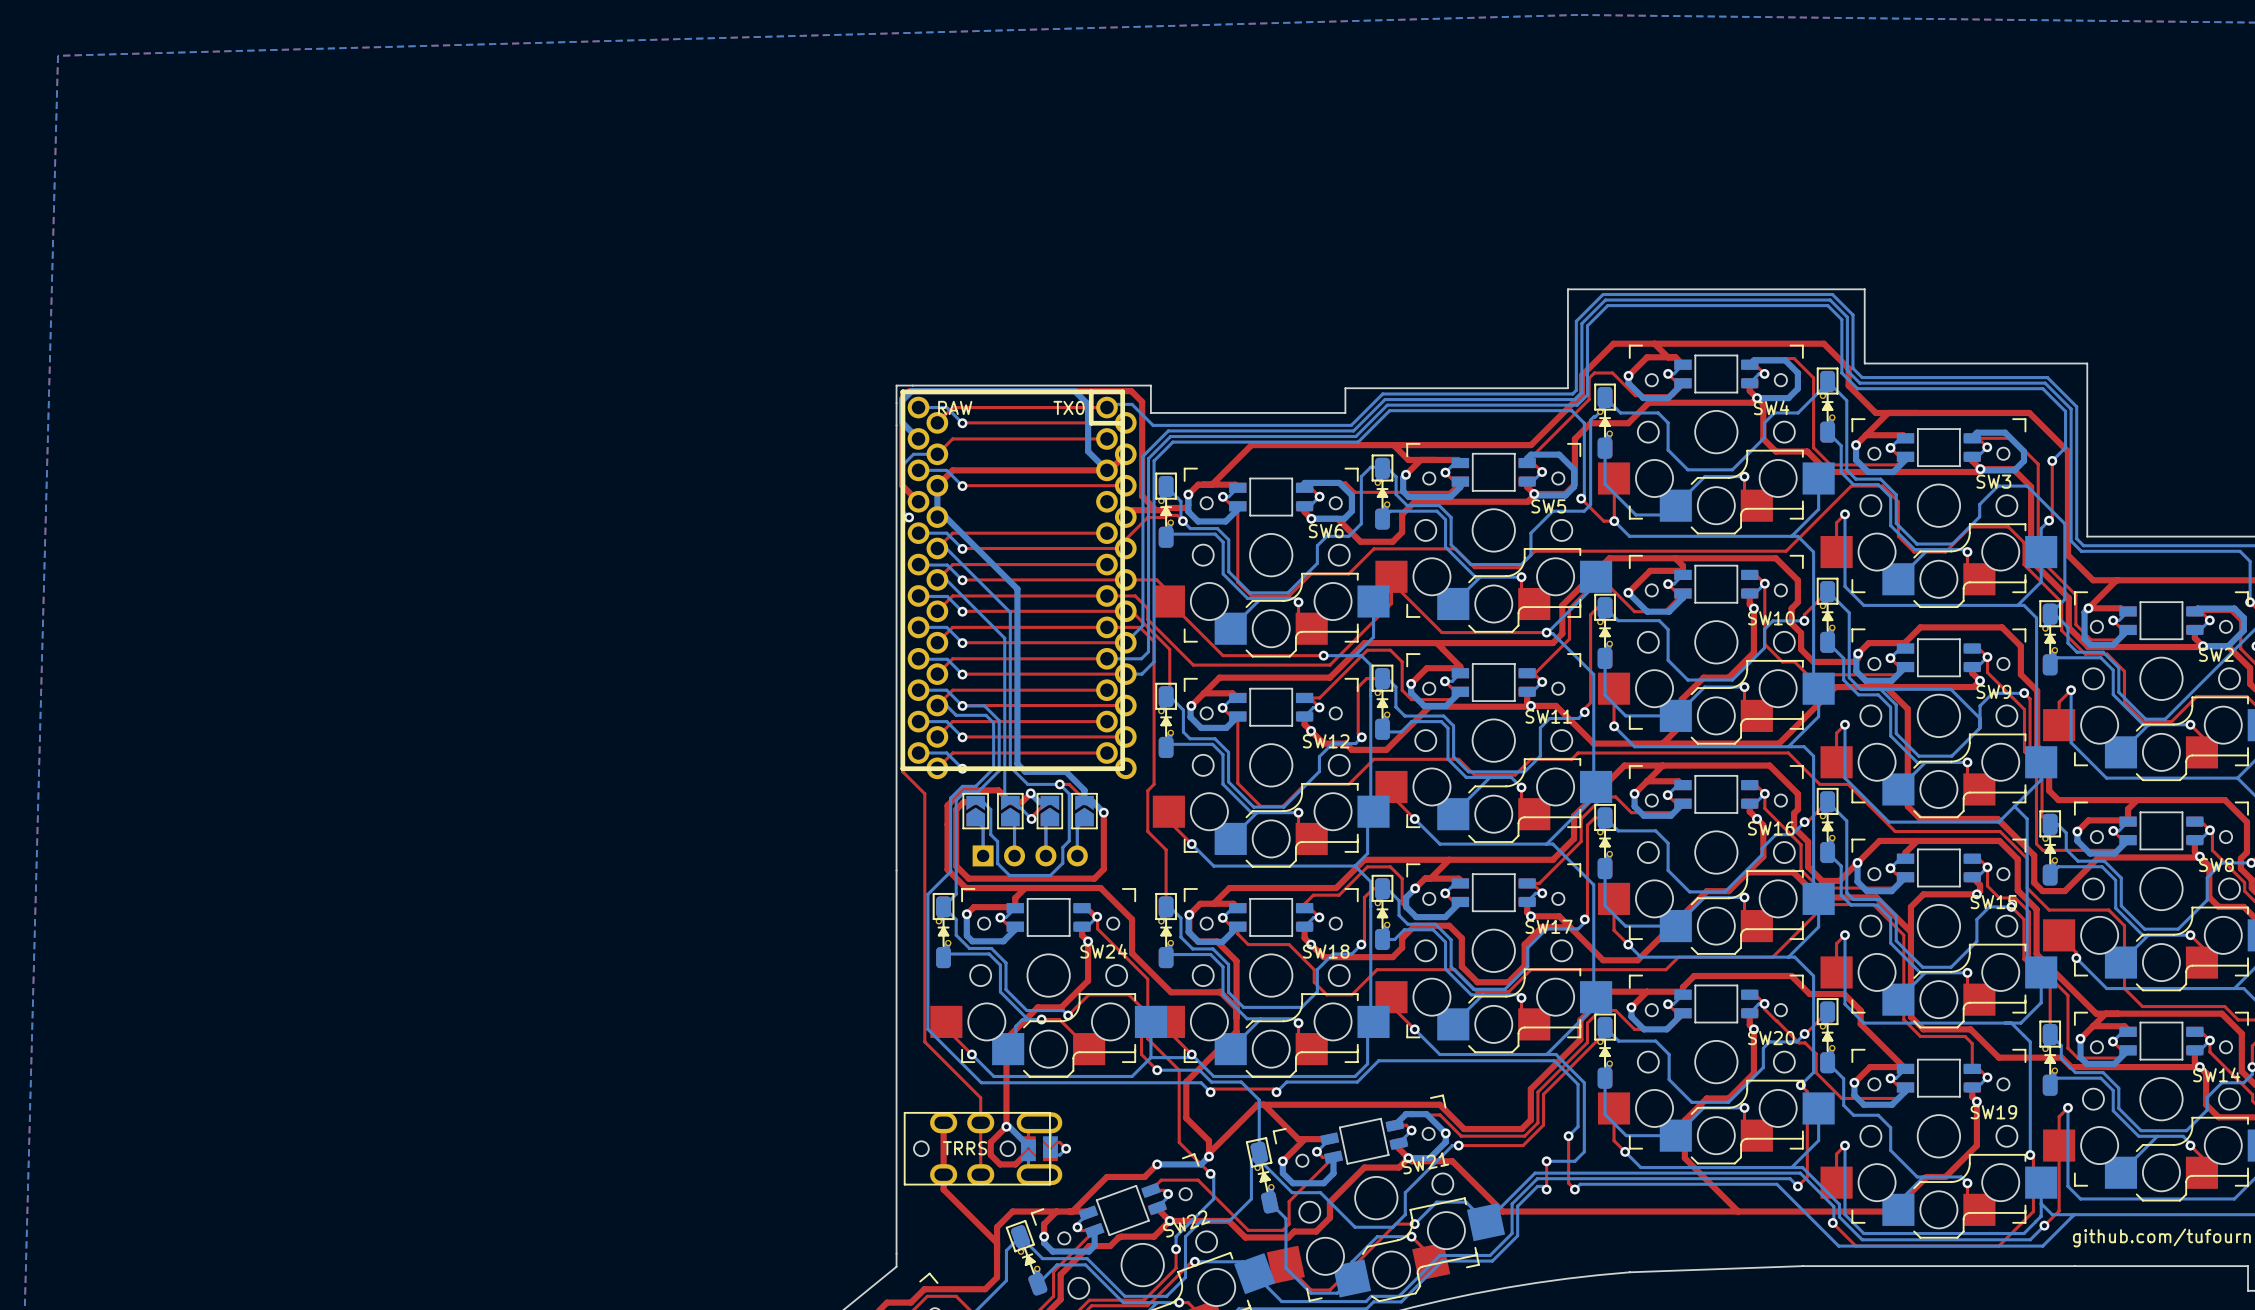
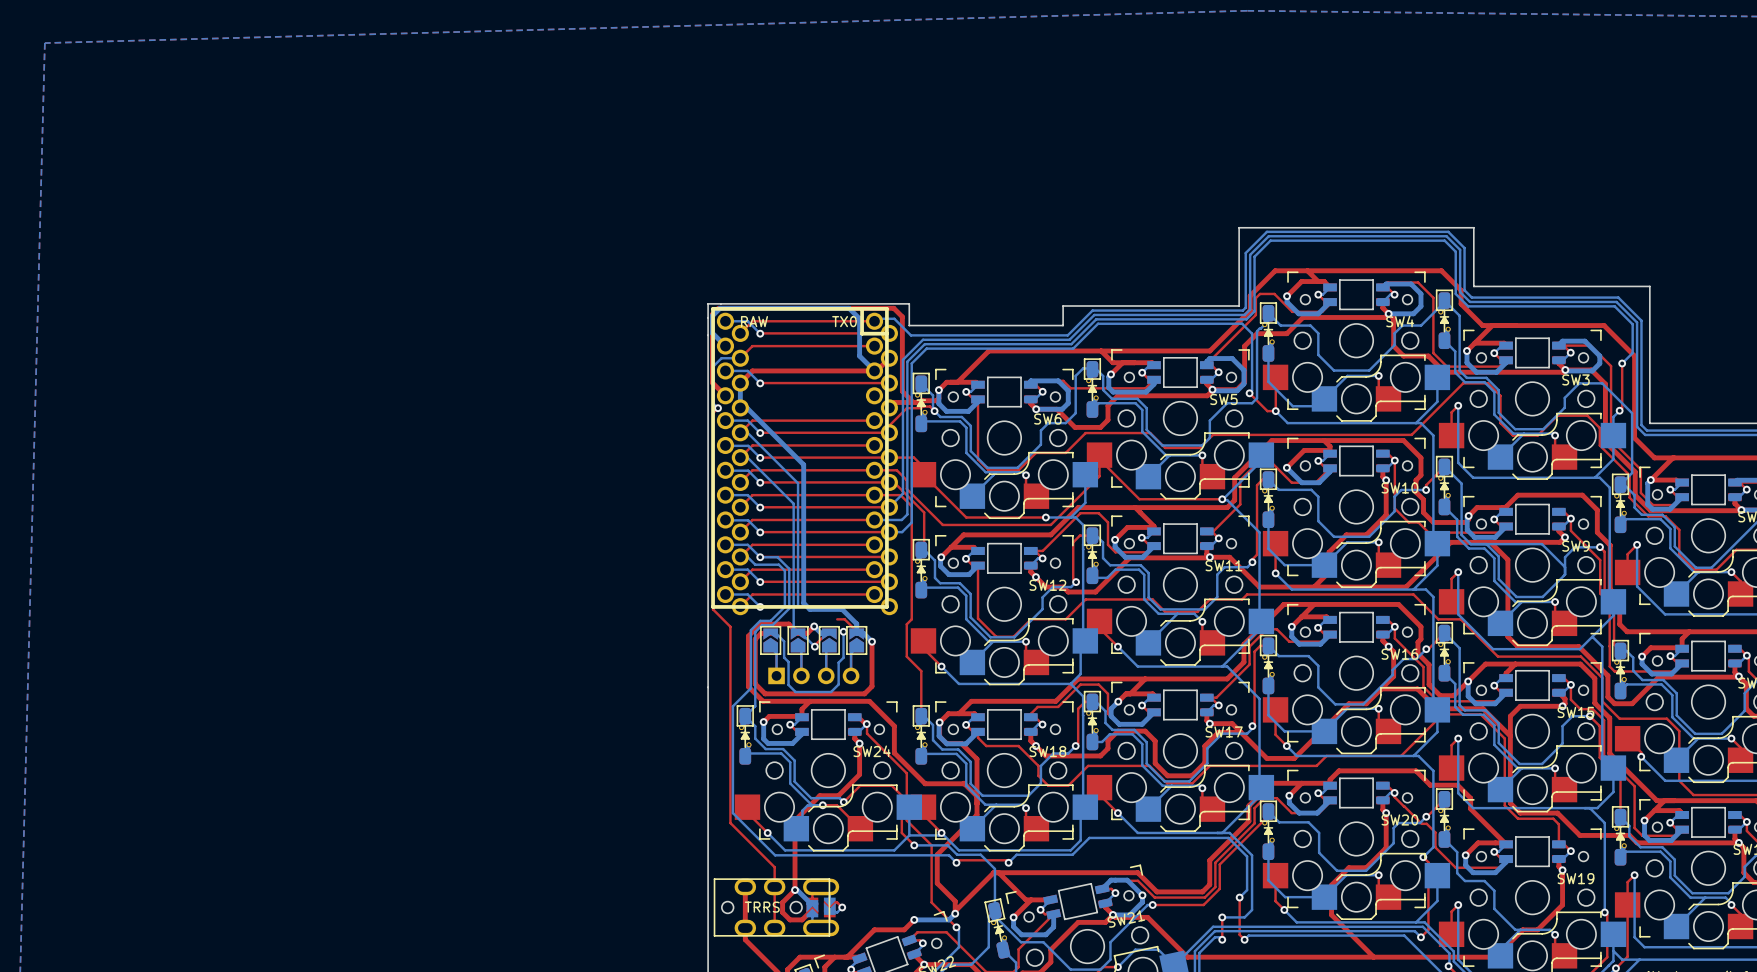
bottom track: (1010, 766) (1027, 784) (1059, 784) (1069, 793) (1069, 840) (1062, 847) (1062, 863) (1050, 875) (1009, 875) (997, 863) (997, 841) (990, 834) (990, 809) (982, 802) -> (843, 631) (843, 657) (838, 662) (838, 684) (831, 692) (795, 692) (788, 684) (788, 661) (784, 657) (784, 641) (776, 633)
via position: (1059, 784) -> (843, 631)

